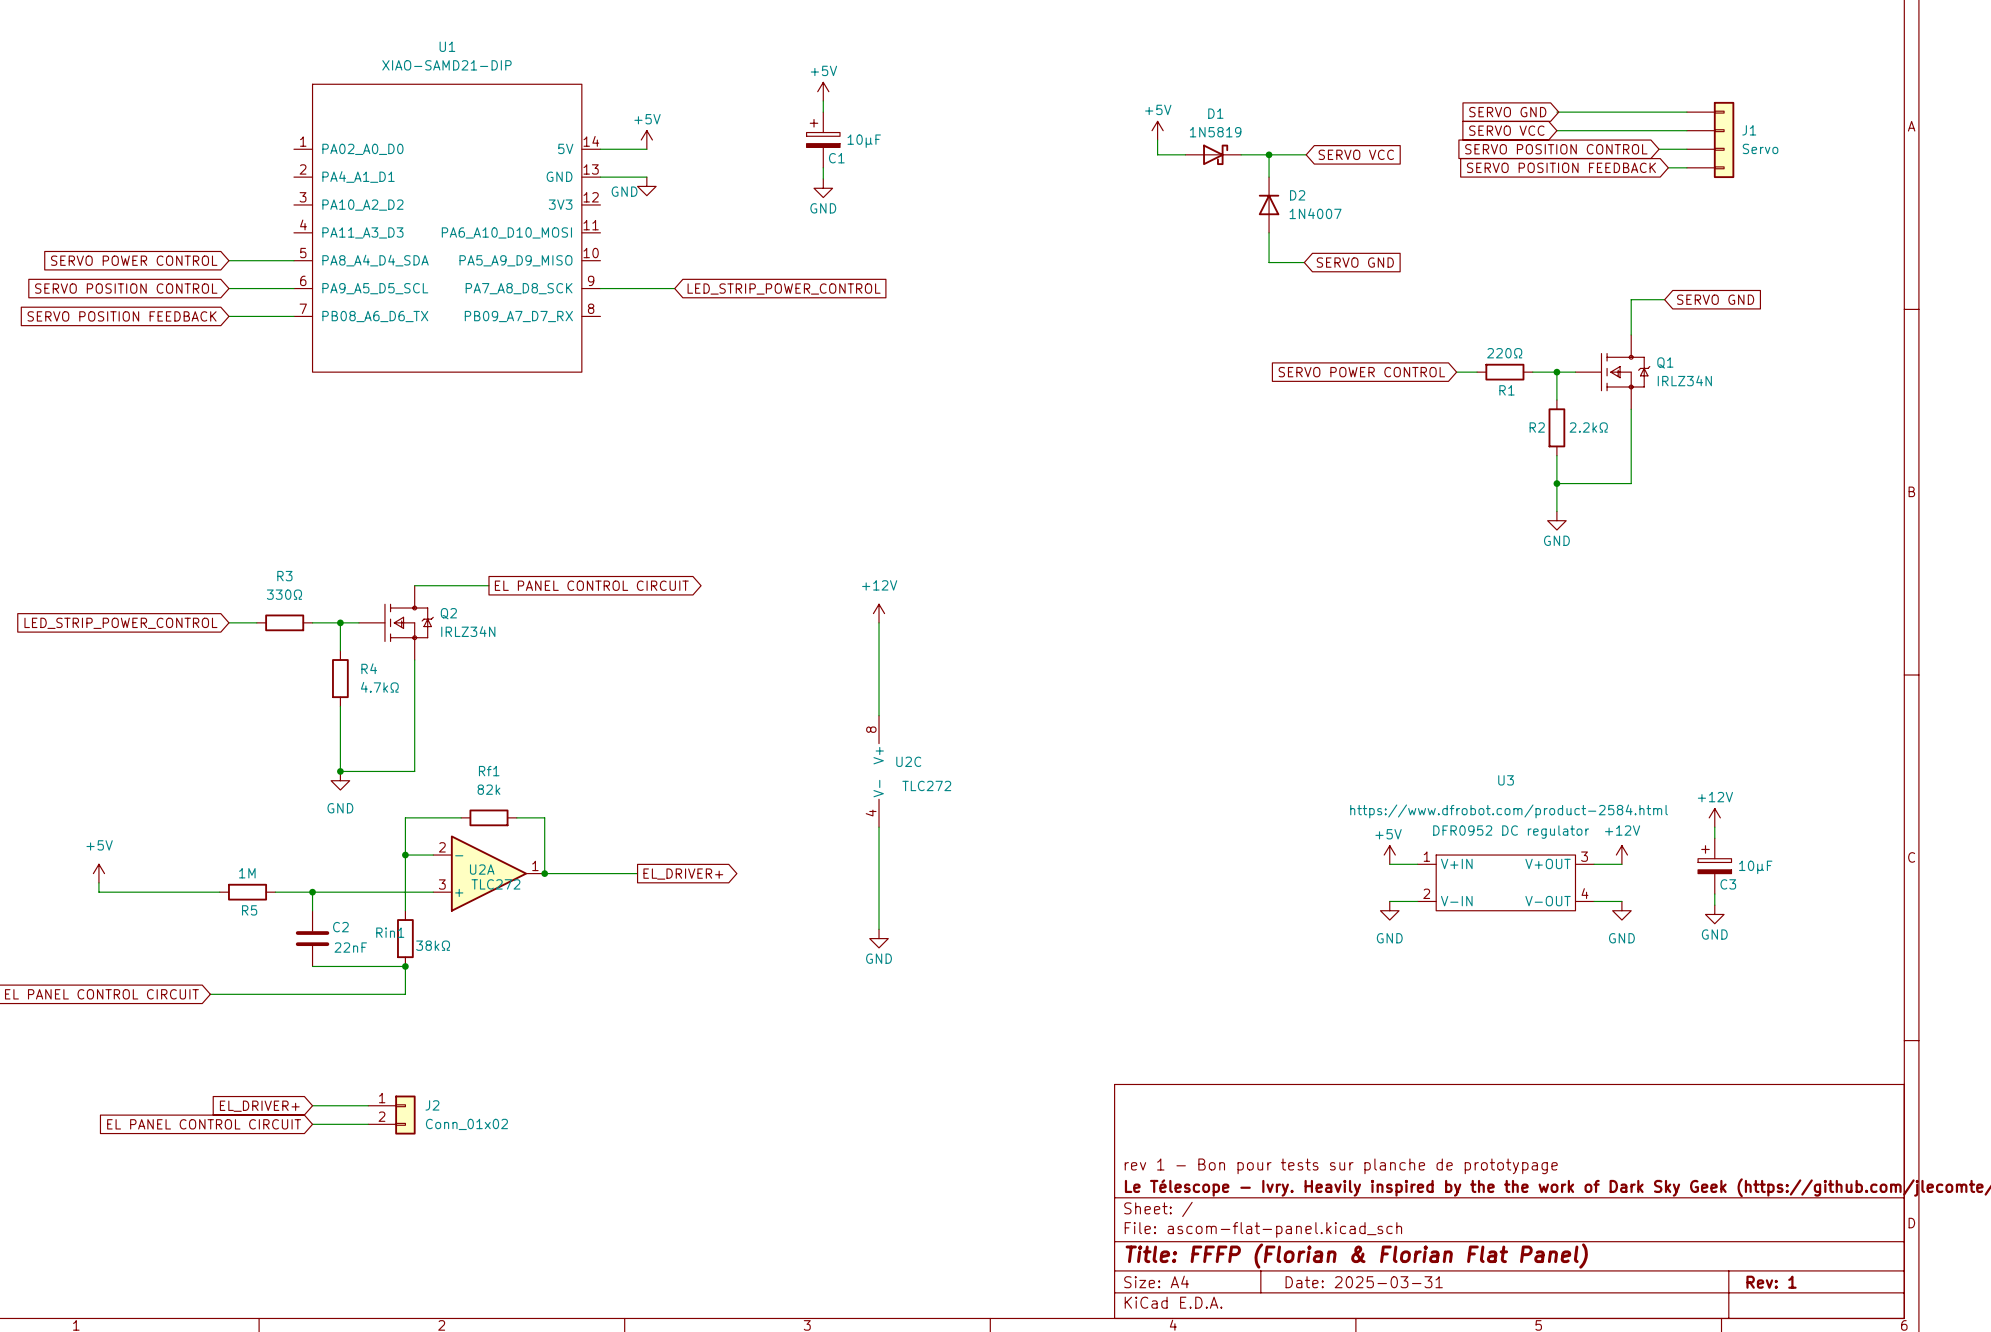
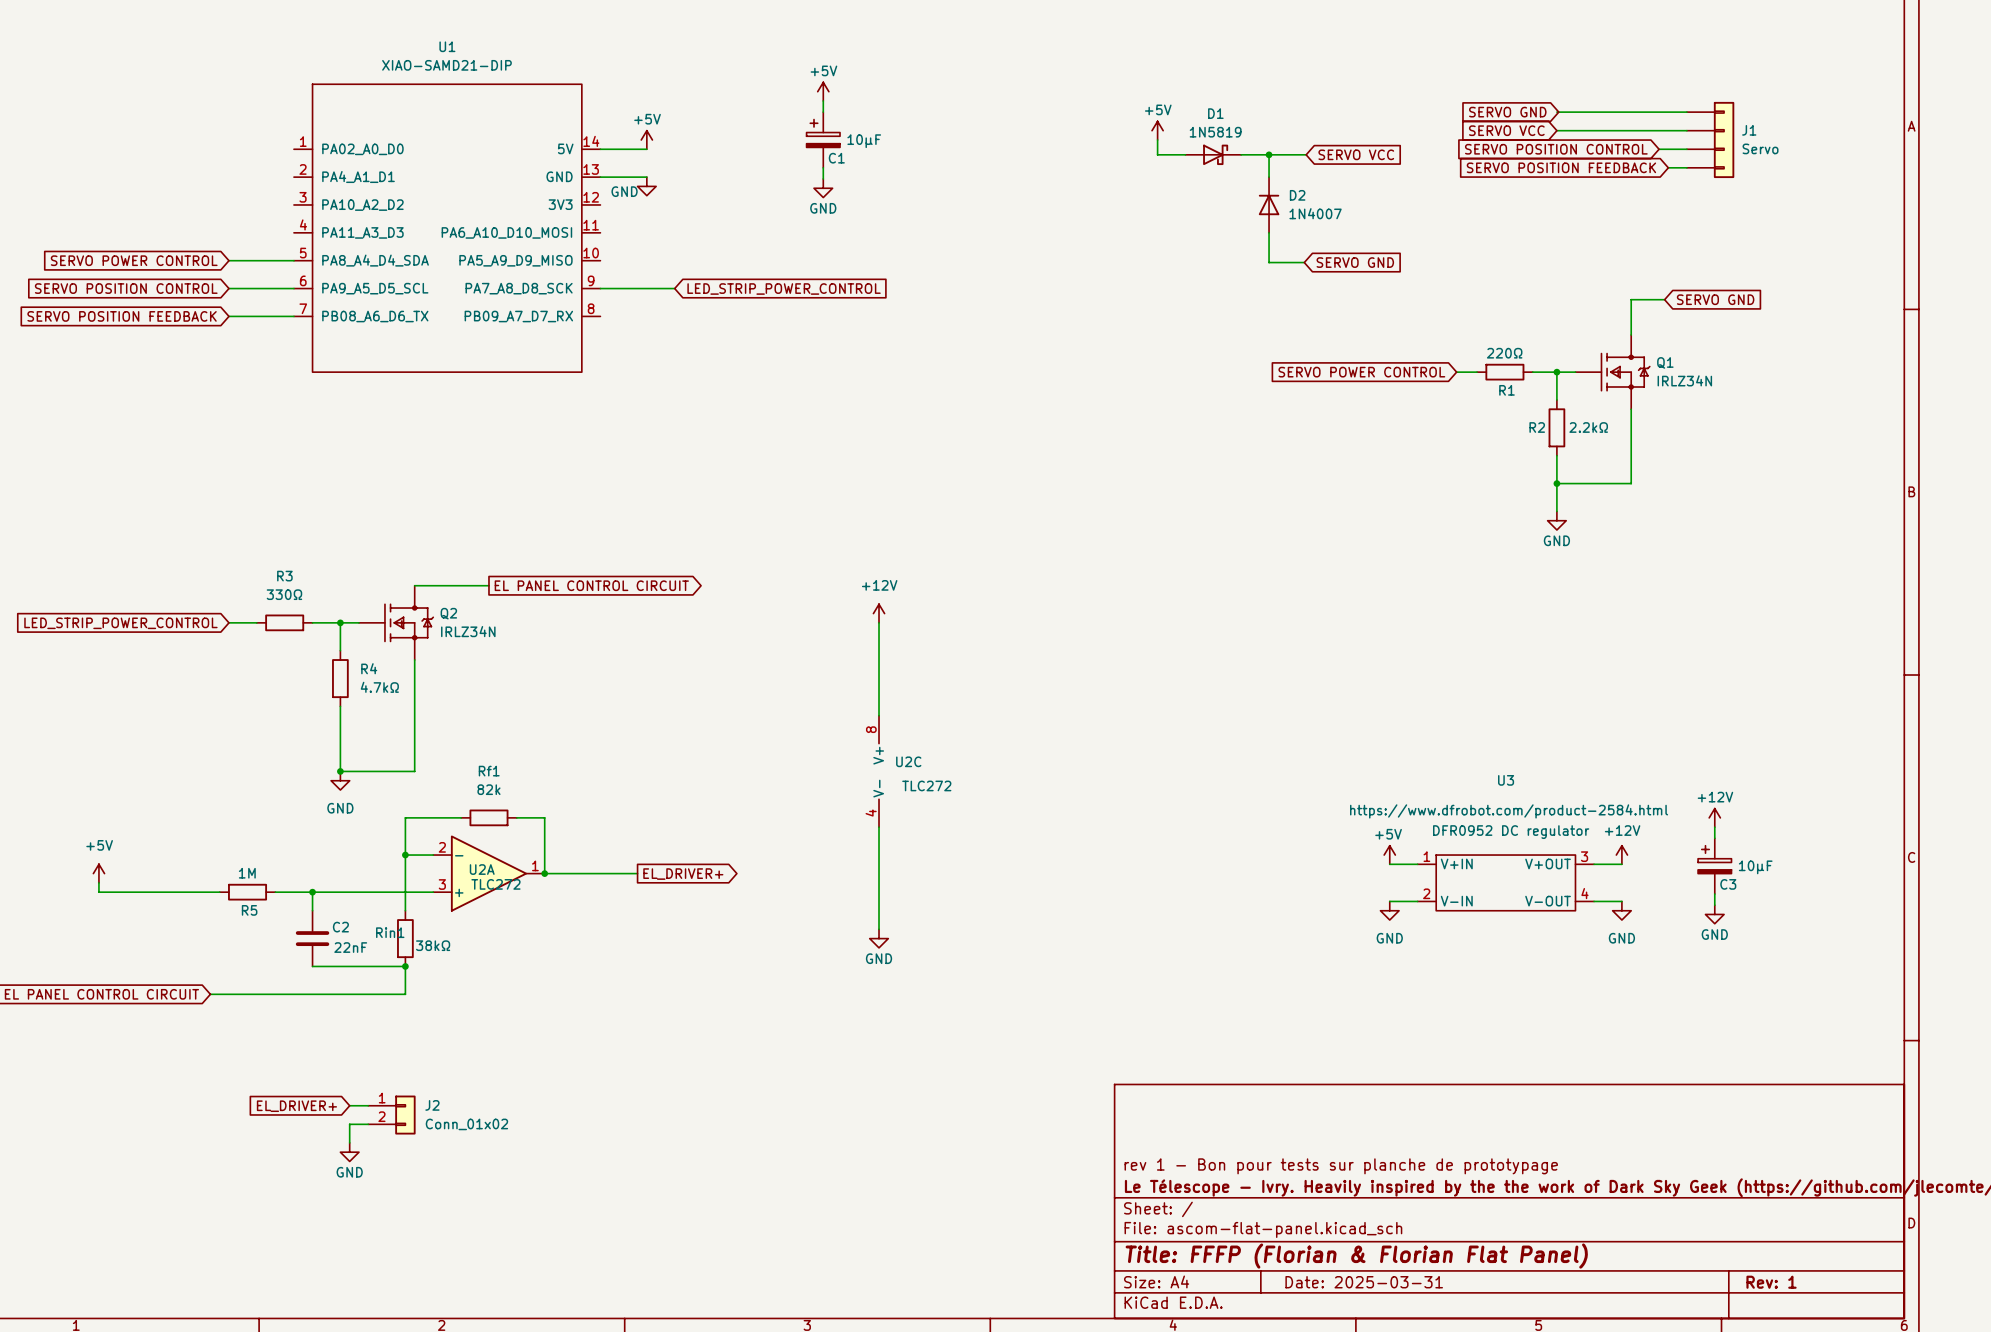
wire: (312, 1105) (349, 1105) -> none
global label position: EL_DRIVER+ (259, 1106) -> EL_DRIVER+ (296, 1106)
global label: EL PANEL CONTROL CIRCUIT (204, 1124) -> none
wire: (312, 1124) (349, 1124) -> (349, 1142) (349, 1124)
power symbol: none -> GND (349, 1152)

